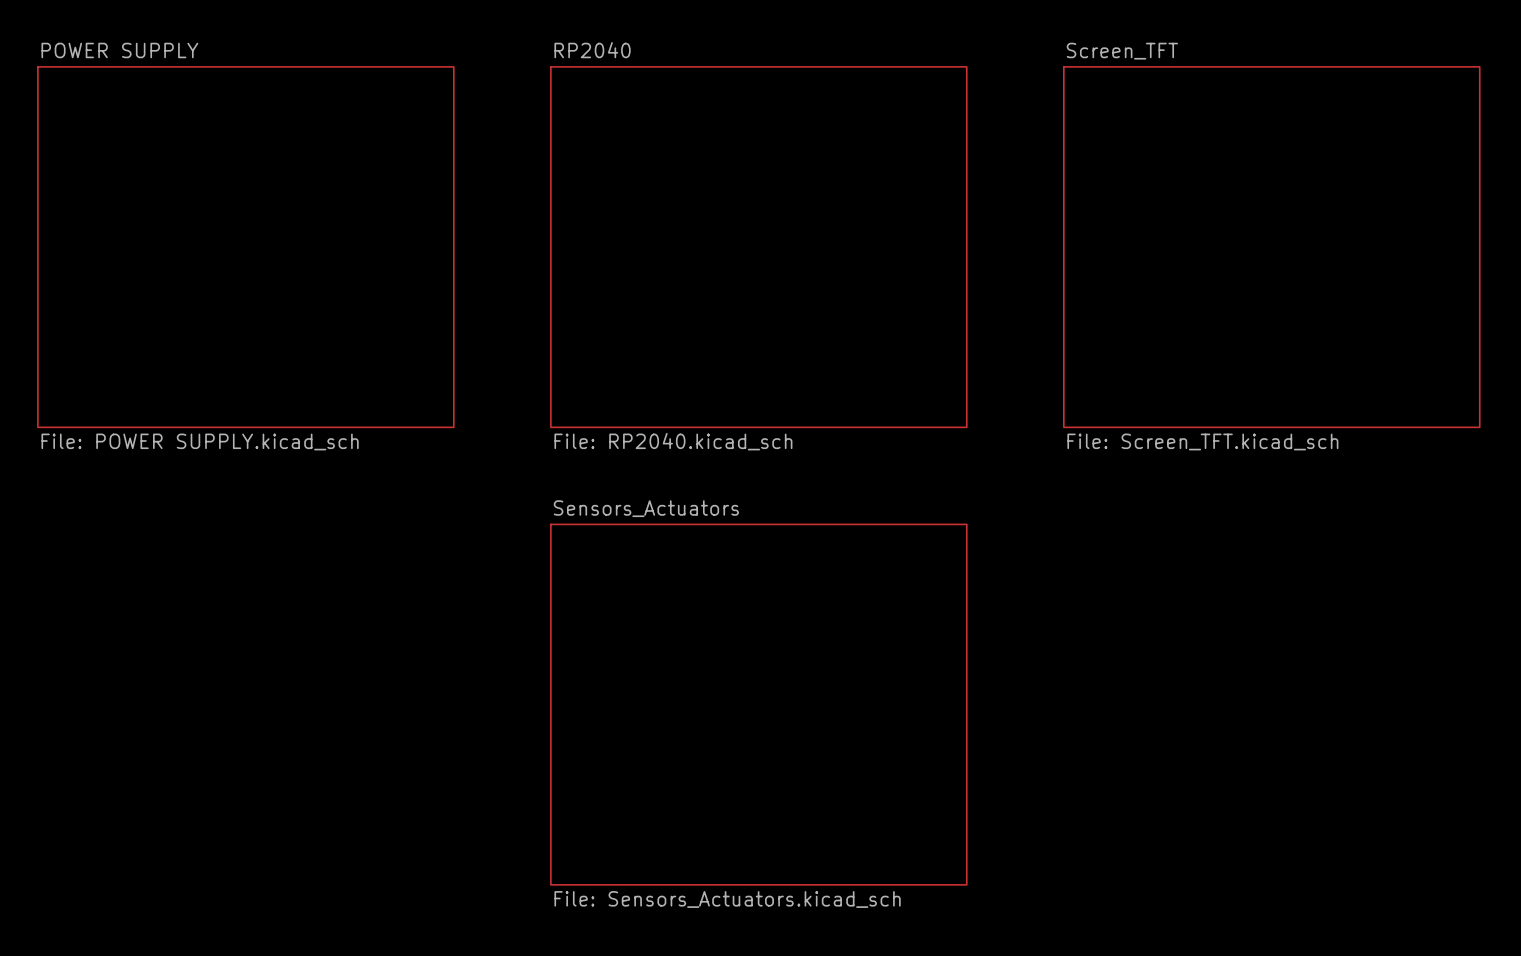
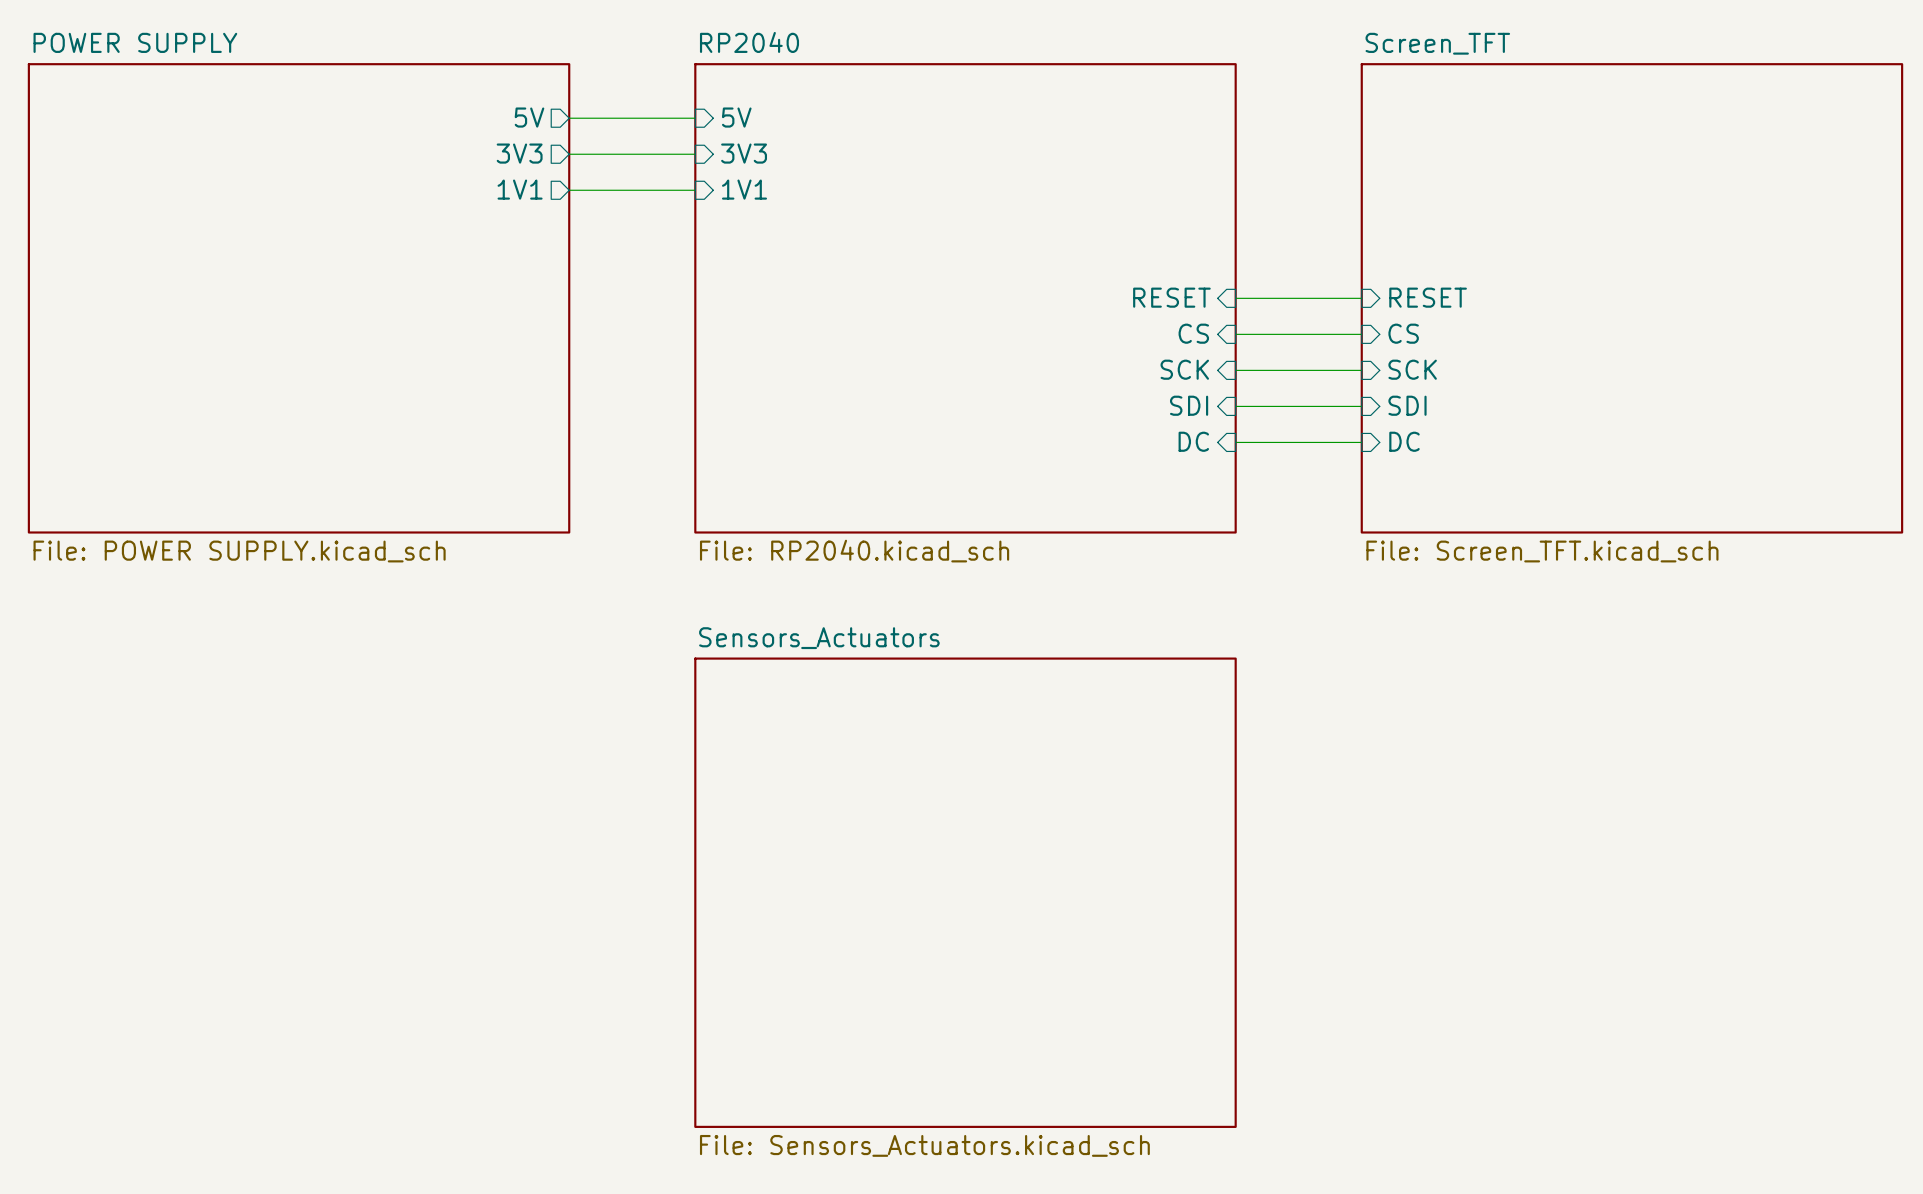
sheet pin: none -> 5V (529, 117)
sheet pin: none -> 5V (736, 117)
wire: none -> (569, 118) (695, 118)
sheet pin: none -> 3V3 (519, 153)
sheet pin: none -> 3V3 (744, 153)
wire: none -> (569, 154) (695, 154)
sheet pin: none -> 1V1 (520, 189)
wire: none -> (569, 190) (695, 190)
sheet pin: none -> 1V1 (744, 189)
sheet pin: none -> RESET (1171, 297)
sheet pin: none -> RESET (1428, 297)
wire: none -> (1235, 298) (1361, 298)
sheet pin: none -> CS (1193, 333)
wire: none -> (1235, 334) (1361, 334)
sheet pin: none -> CS (1403, 333)
sheet pin: none -> SCK (1184, 369)
wire: none -> (1235, 370) (1361, 370)
sheet pin: none -> SCK (1412, 369)
sheet pin: none -> SDI (1189, 405)
sheet pin: none -> SDI (1407, 405)
wire: none -> (1235, 406) (1361, 406)
sheet pin: none -> DC (1193, 441)
sheet pin: none -> DC (1404, 441)
wire: none -> (1235, 442) (1361, 442)

